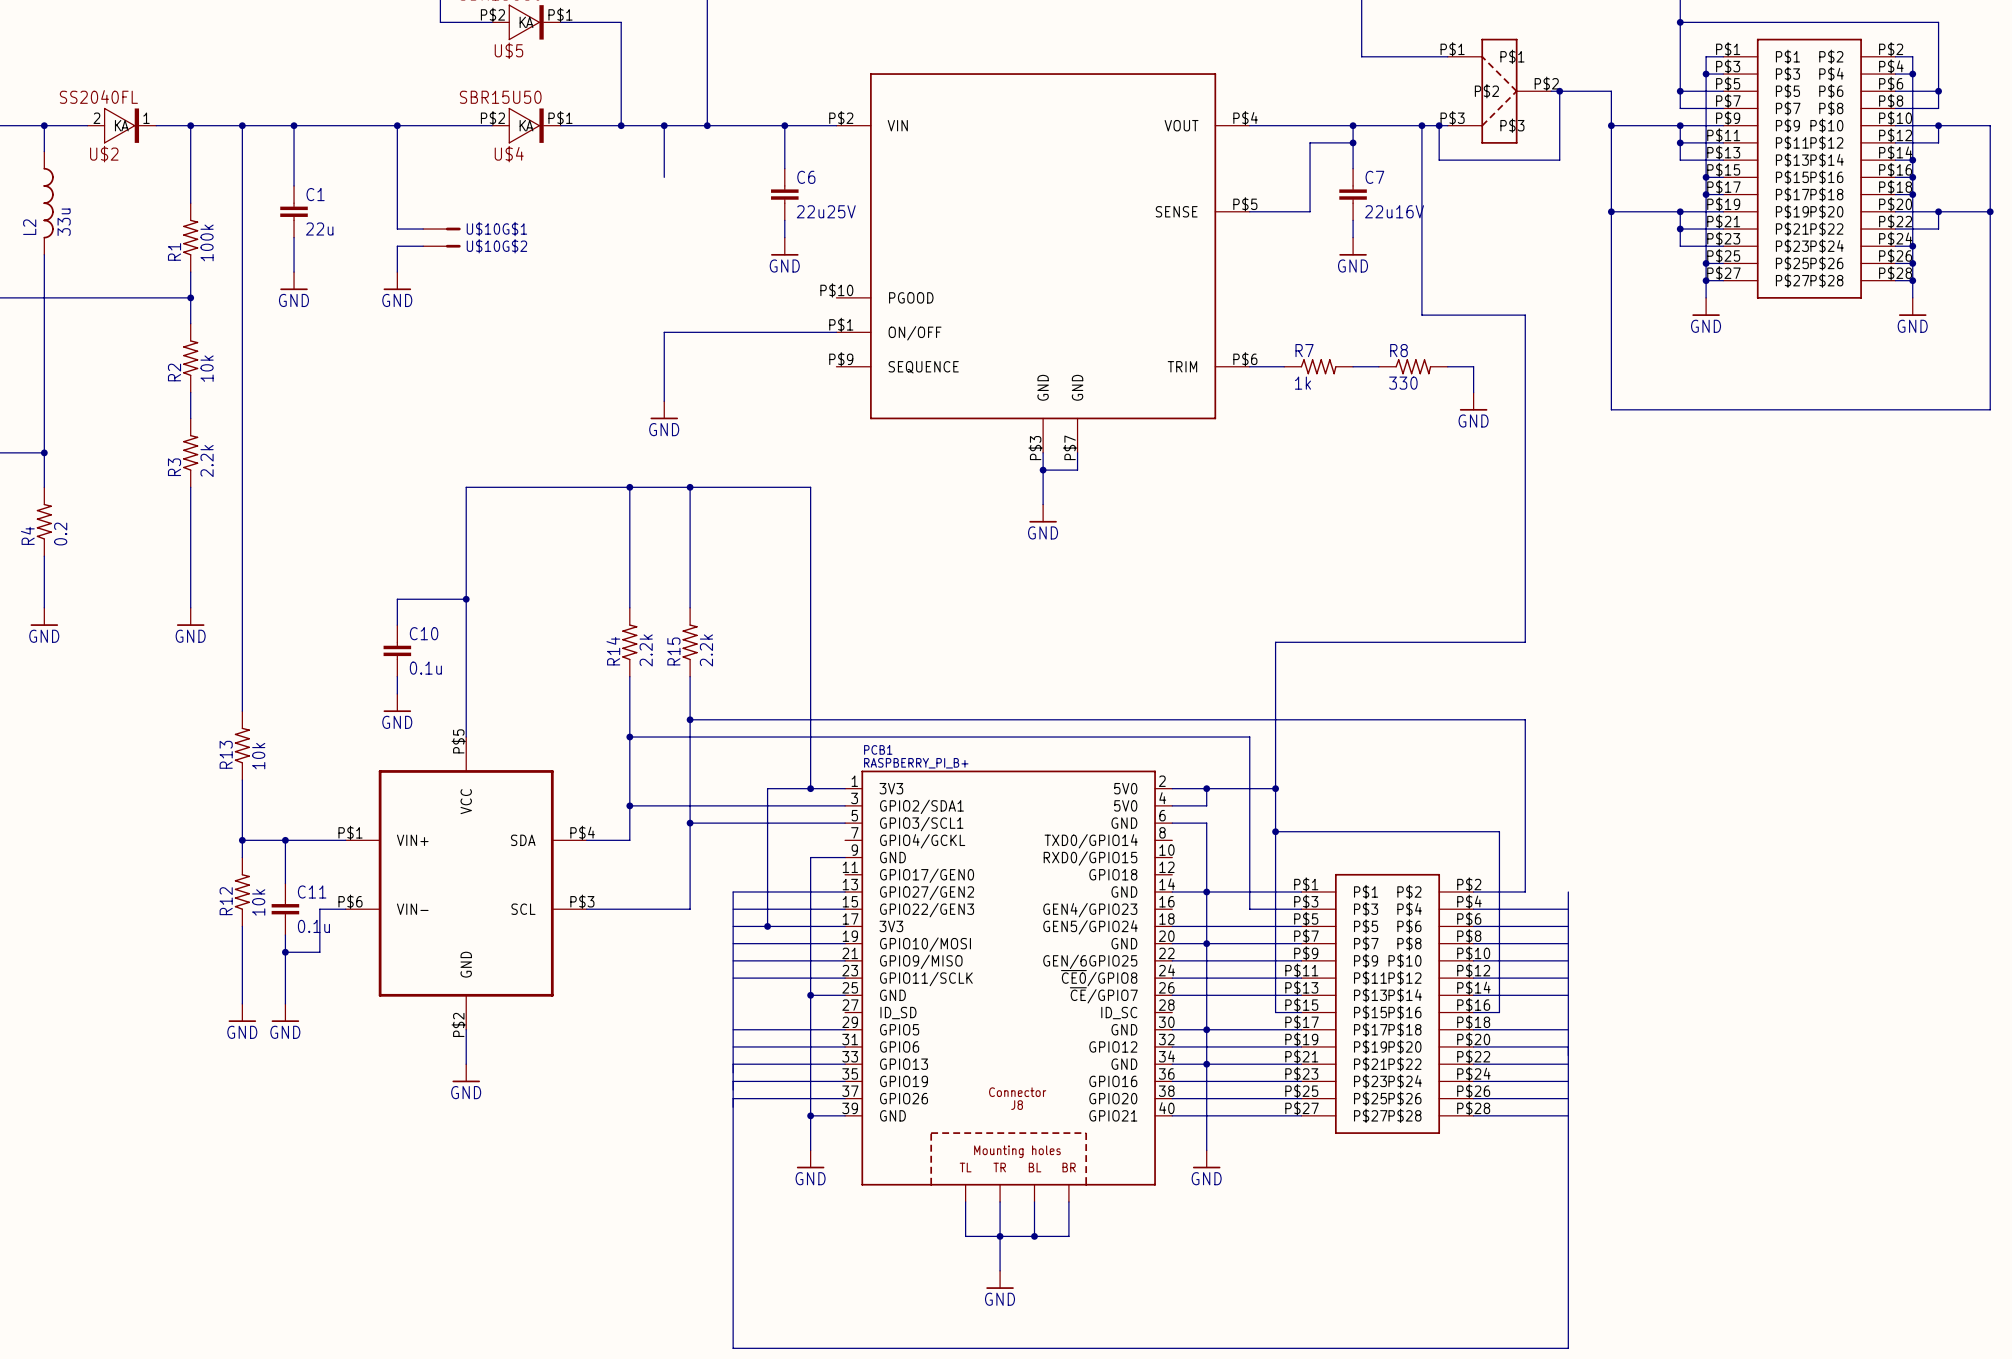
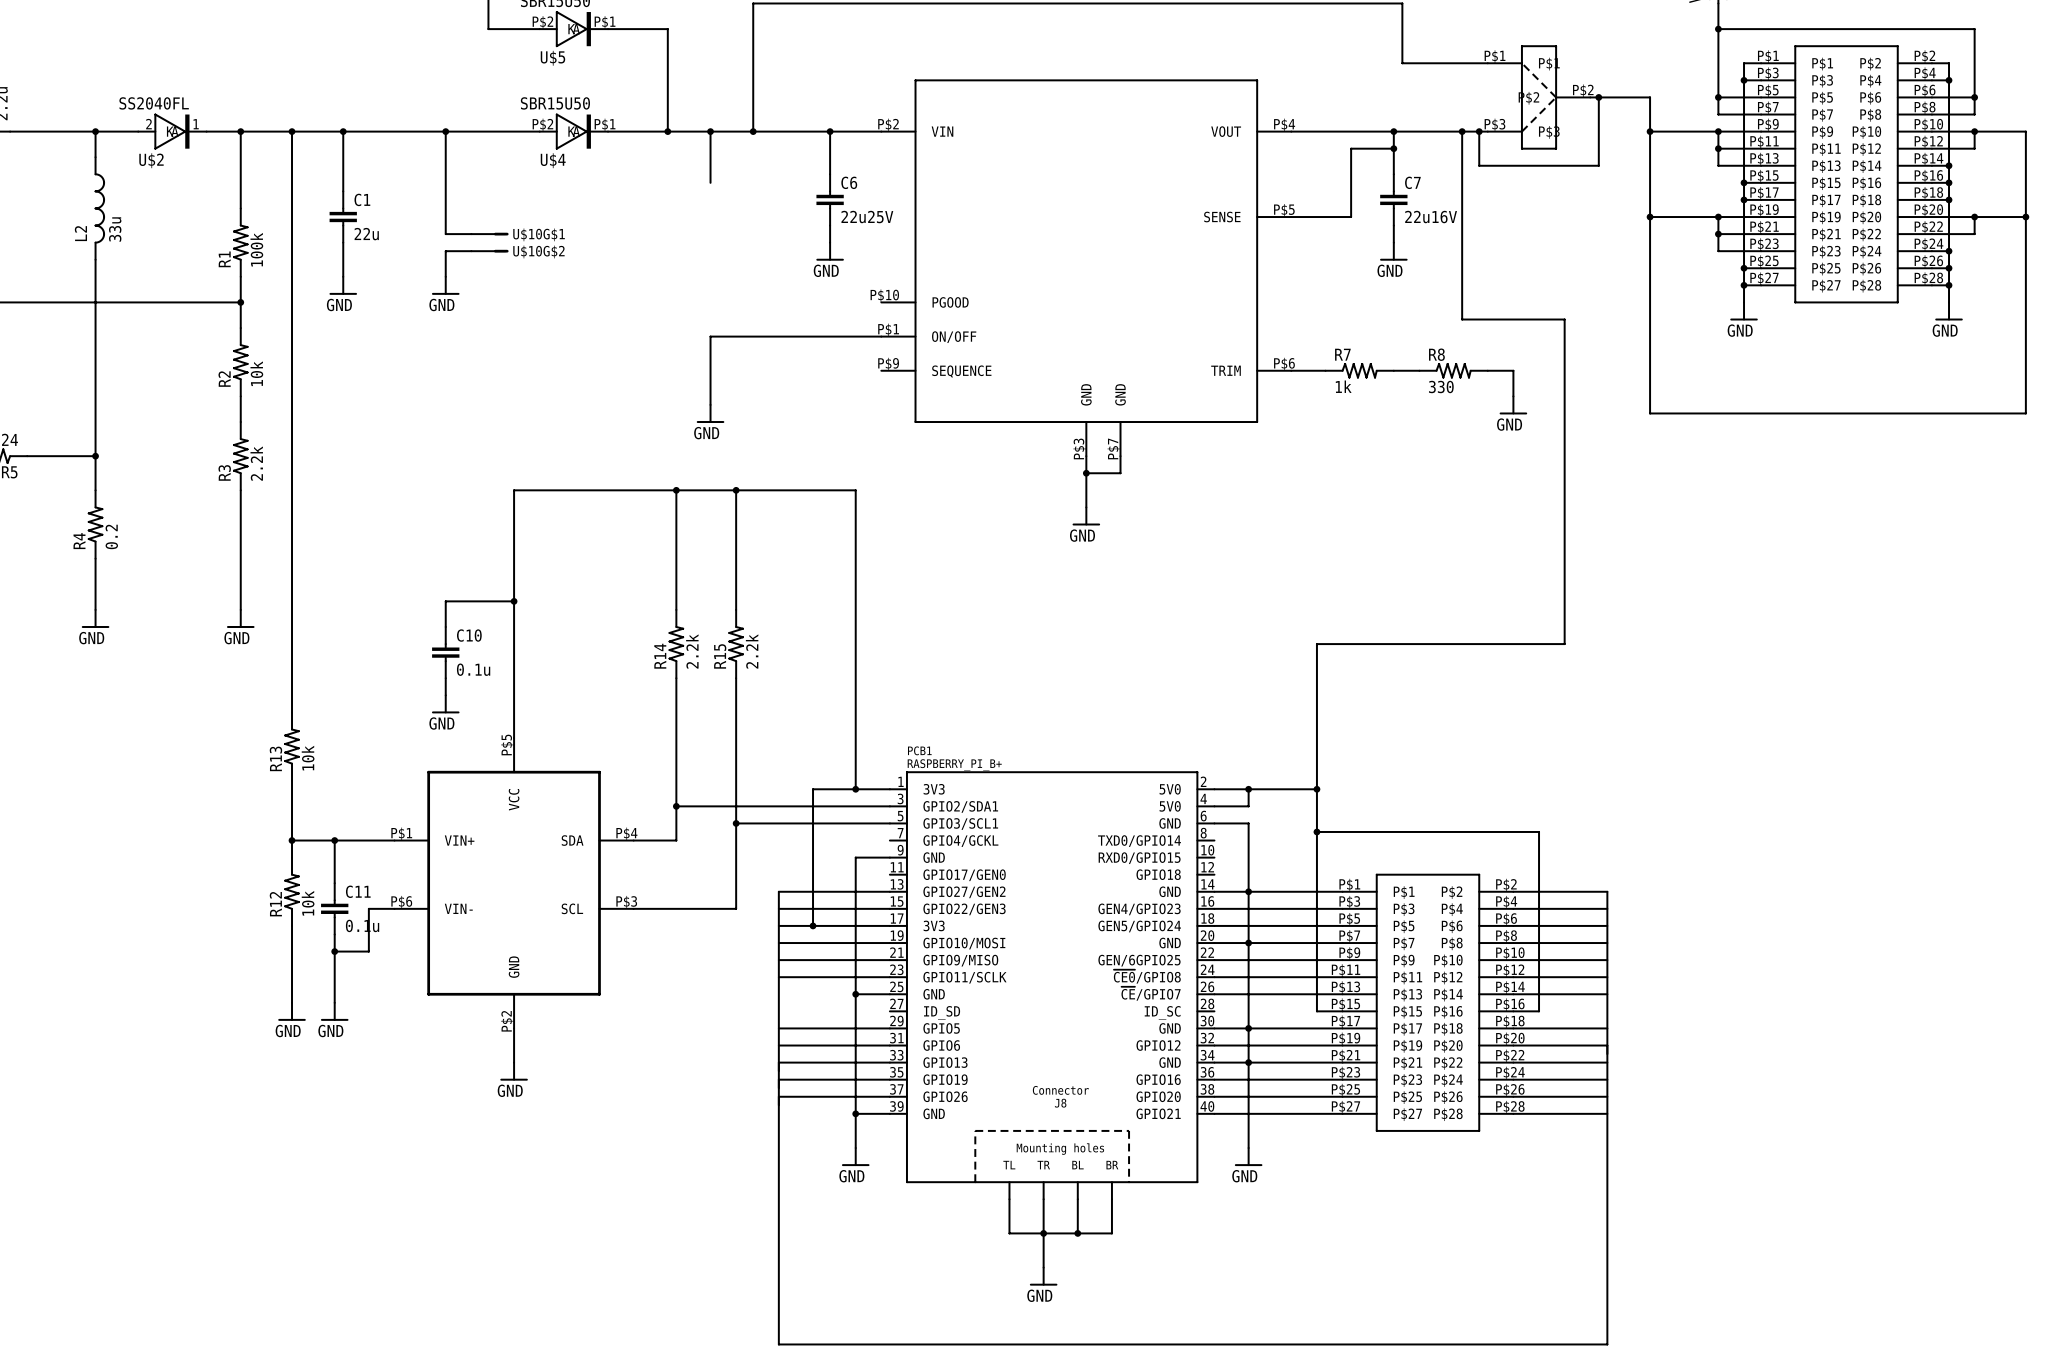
wire: (690, 719) (1525, 719) (1525, 891) -> (1607, 891) (1564, 891)
junction: (690, 719) -> none
wire: (629, 737) (1249, 737) (1249, 909) -> (1214, 908) (1291, 908)
junction: (629, 737) -> none

